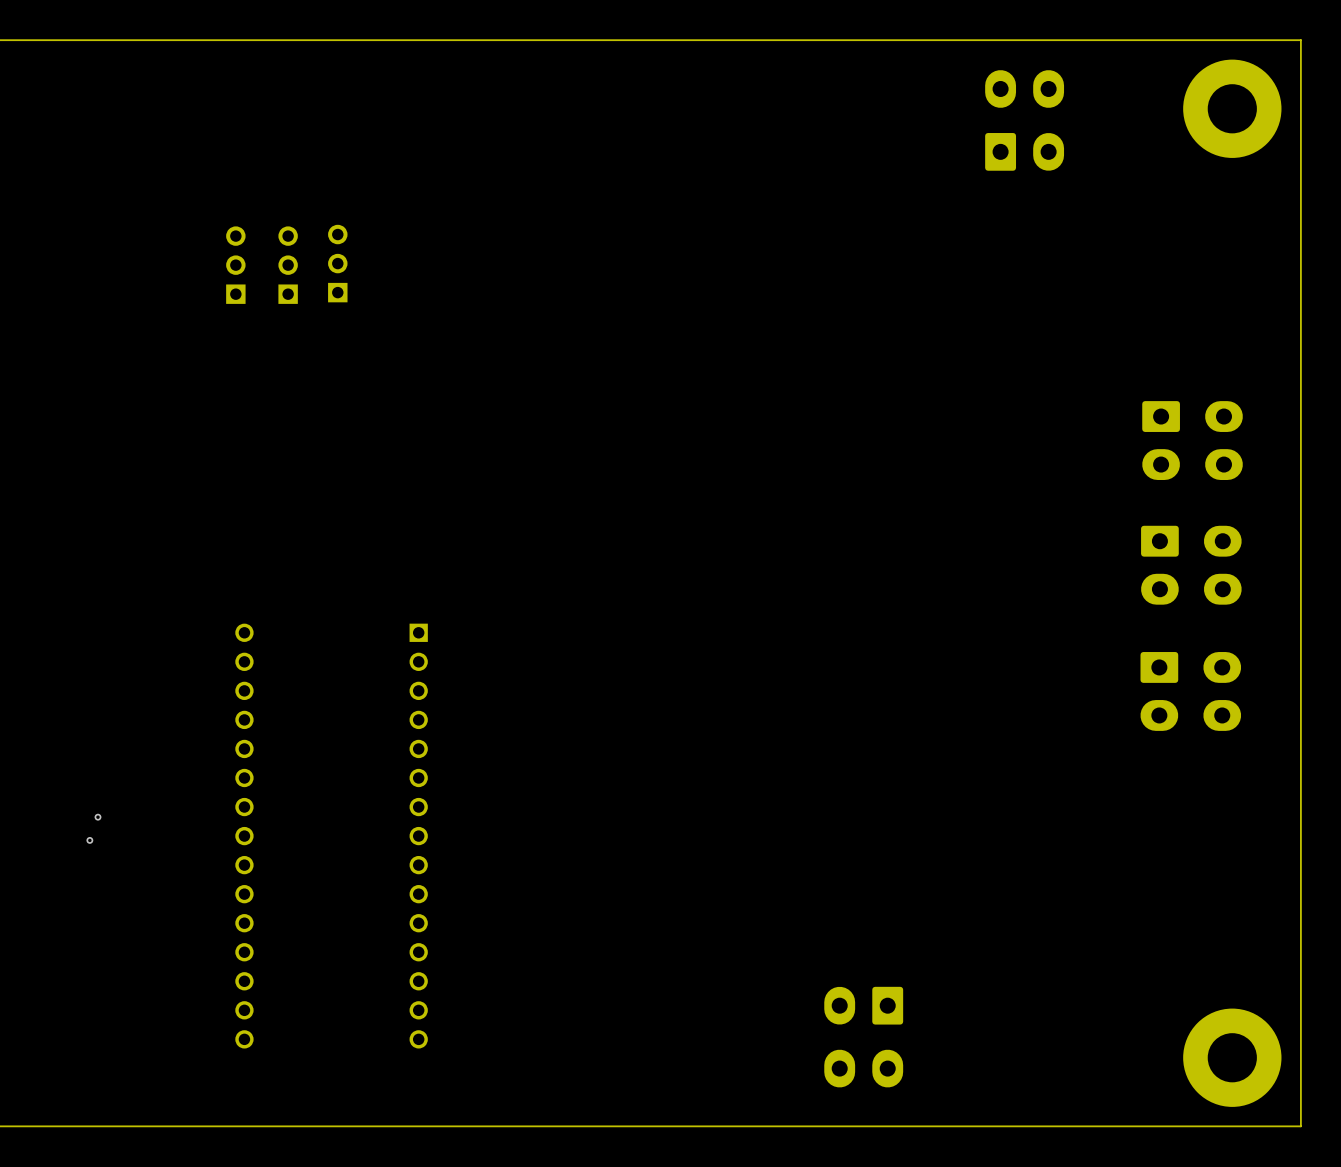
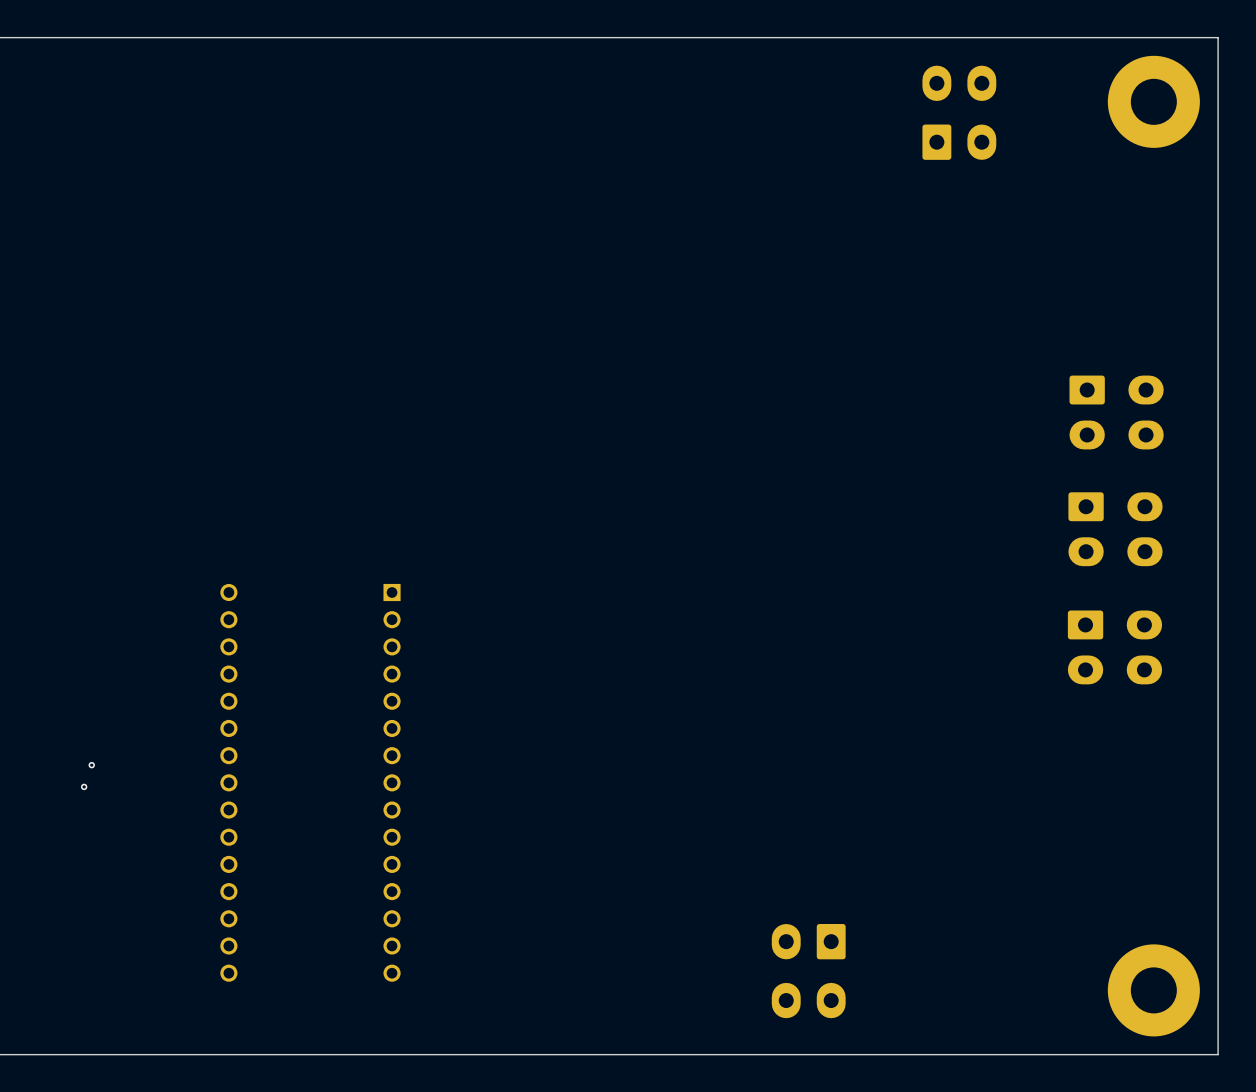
part: (337, 263) -> none
part: (235, 265) -> none
part: (288, 265) -> none

